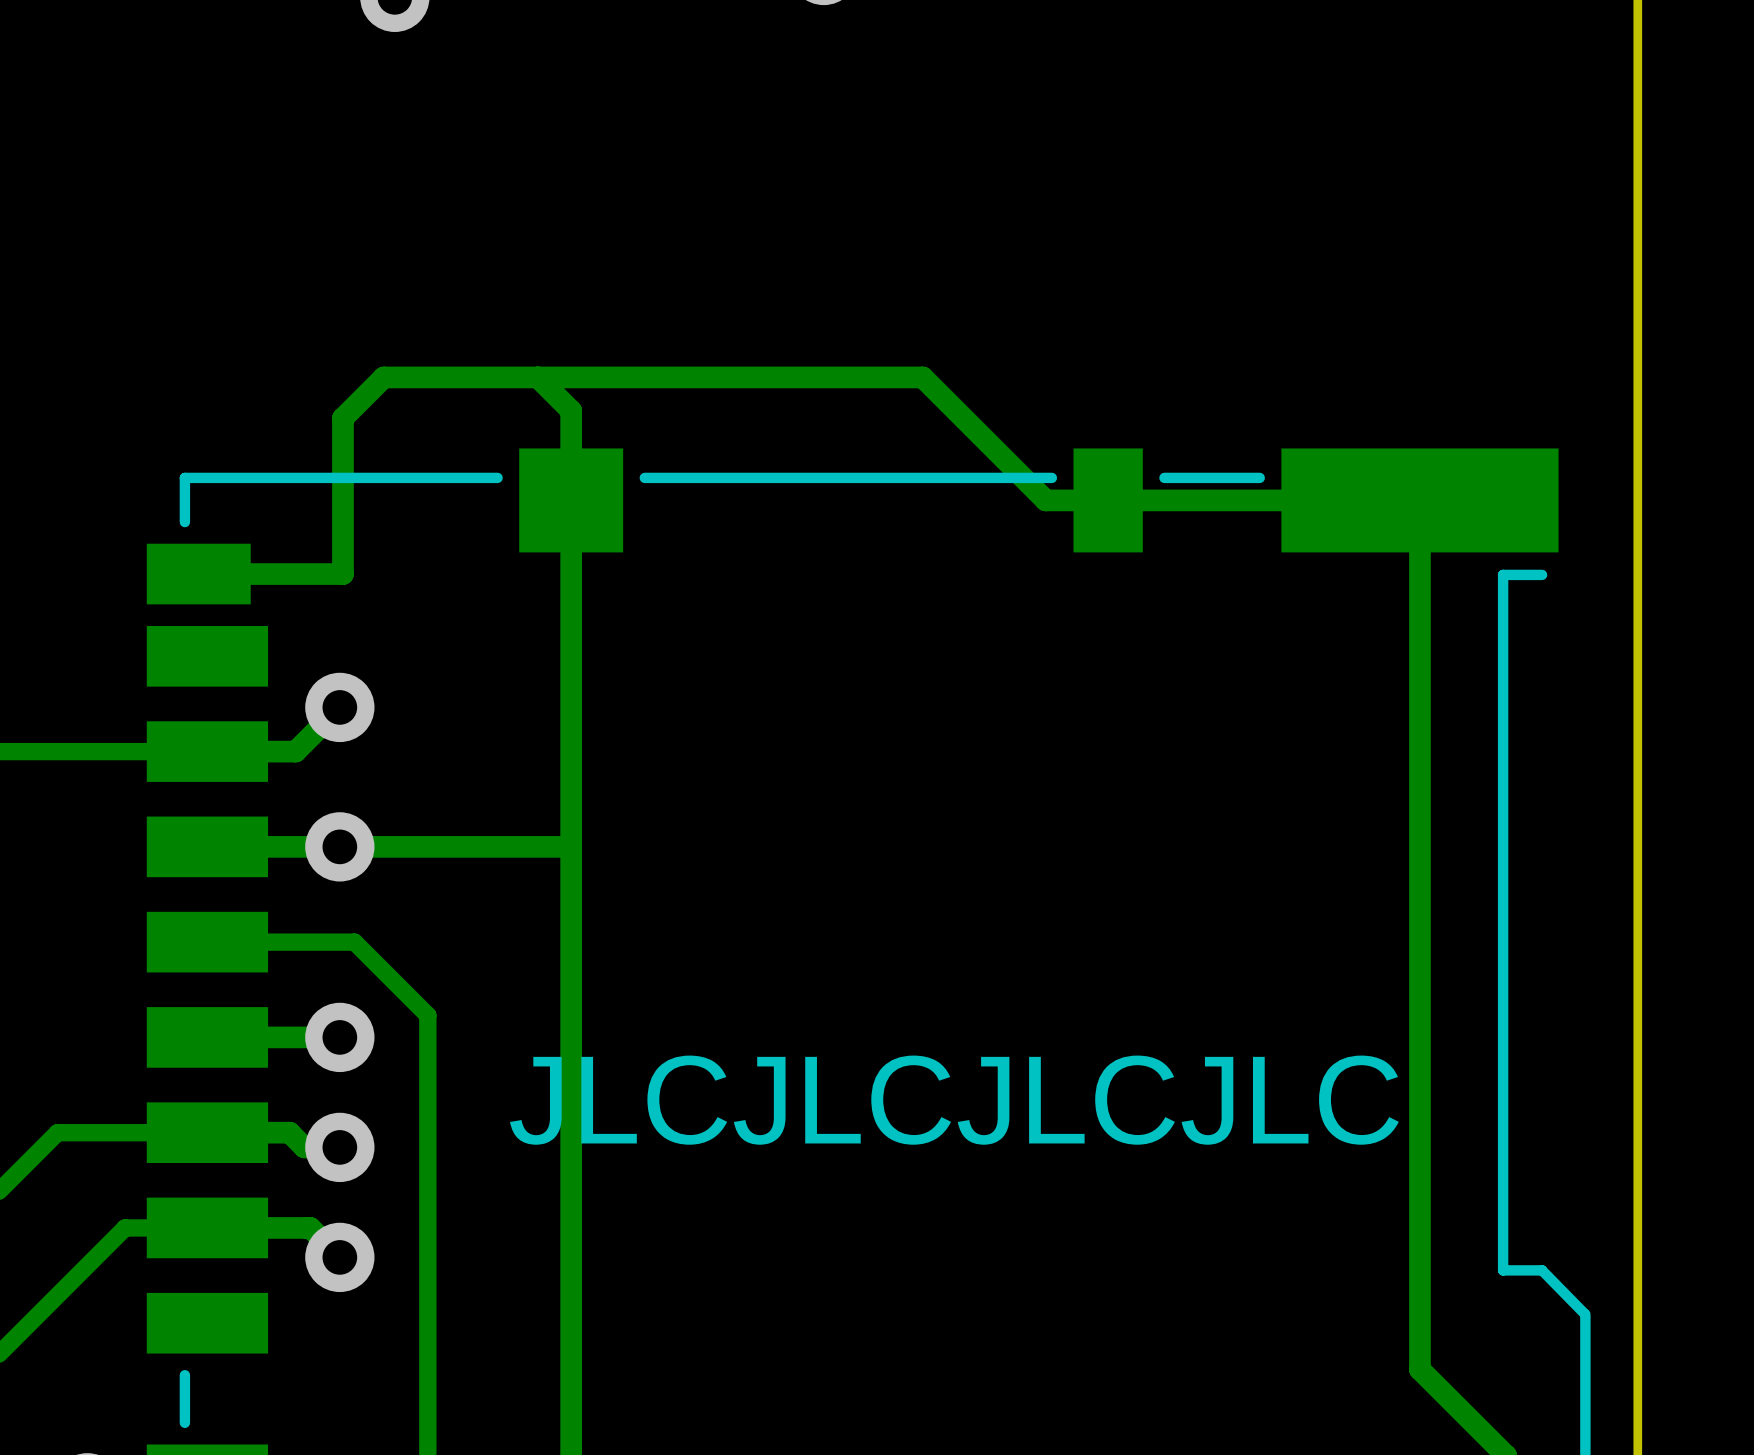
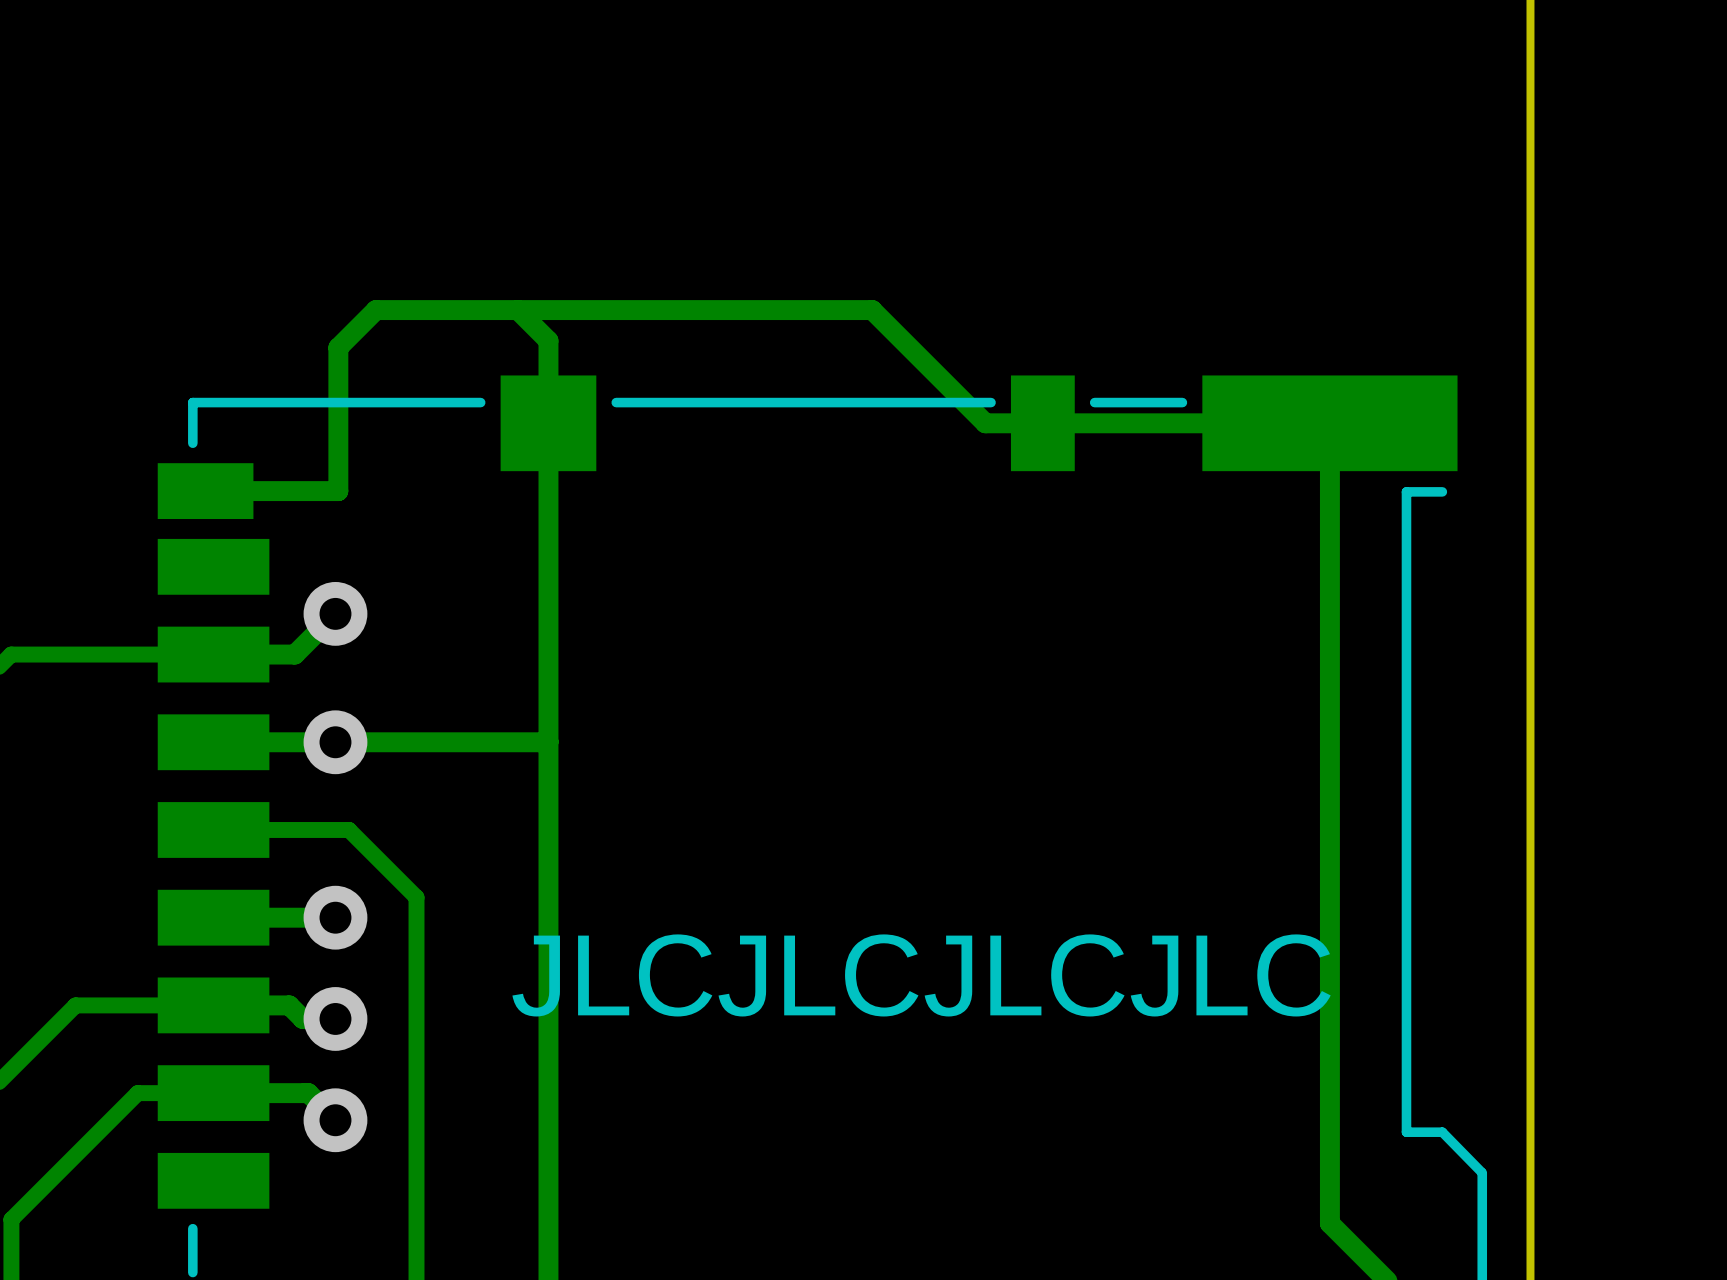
text position: JLCJLCJLCJLC (954, 1100) -> JLCJLCJLCJLC (921, 975)

